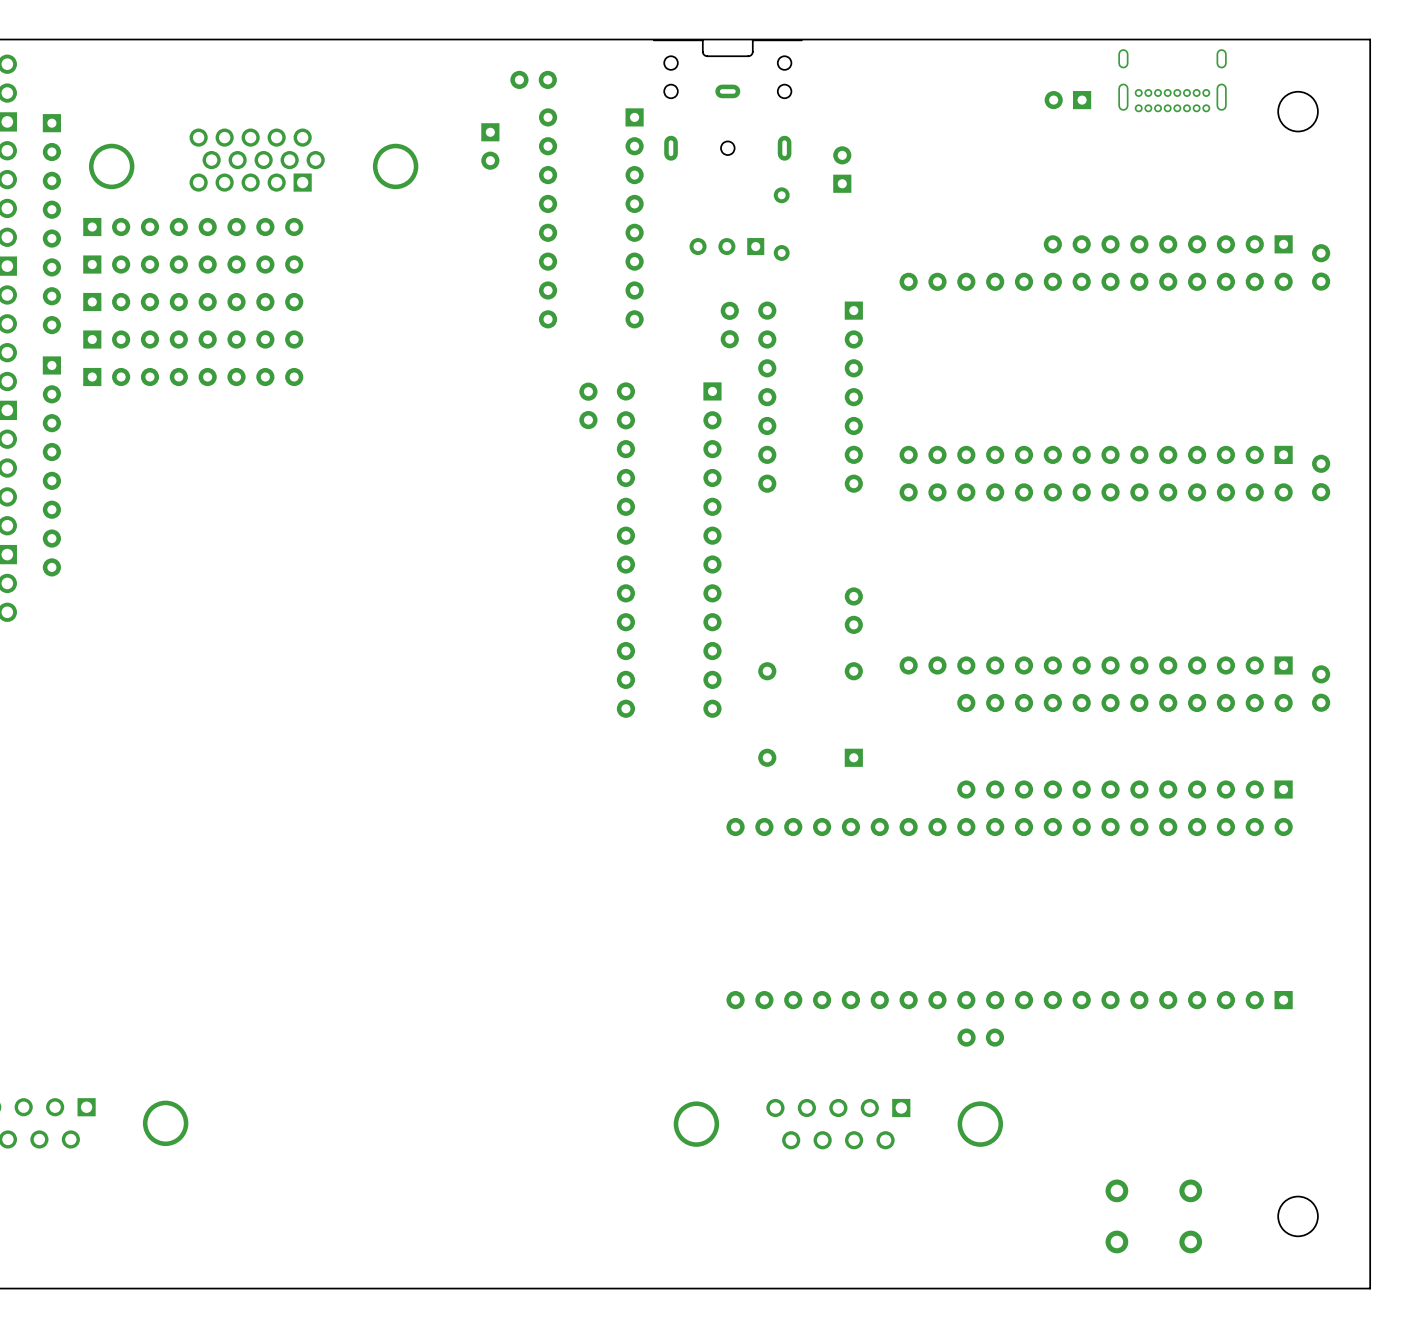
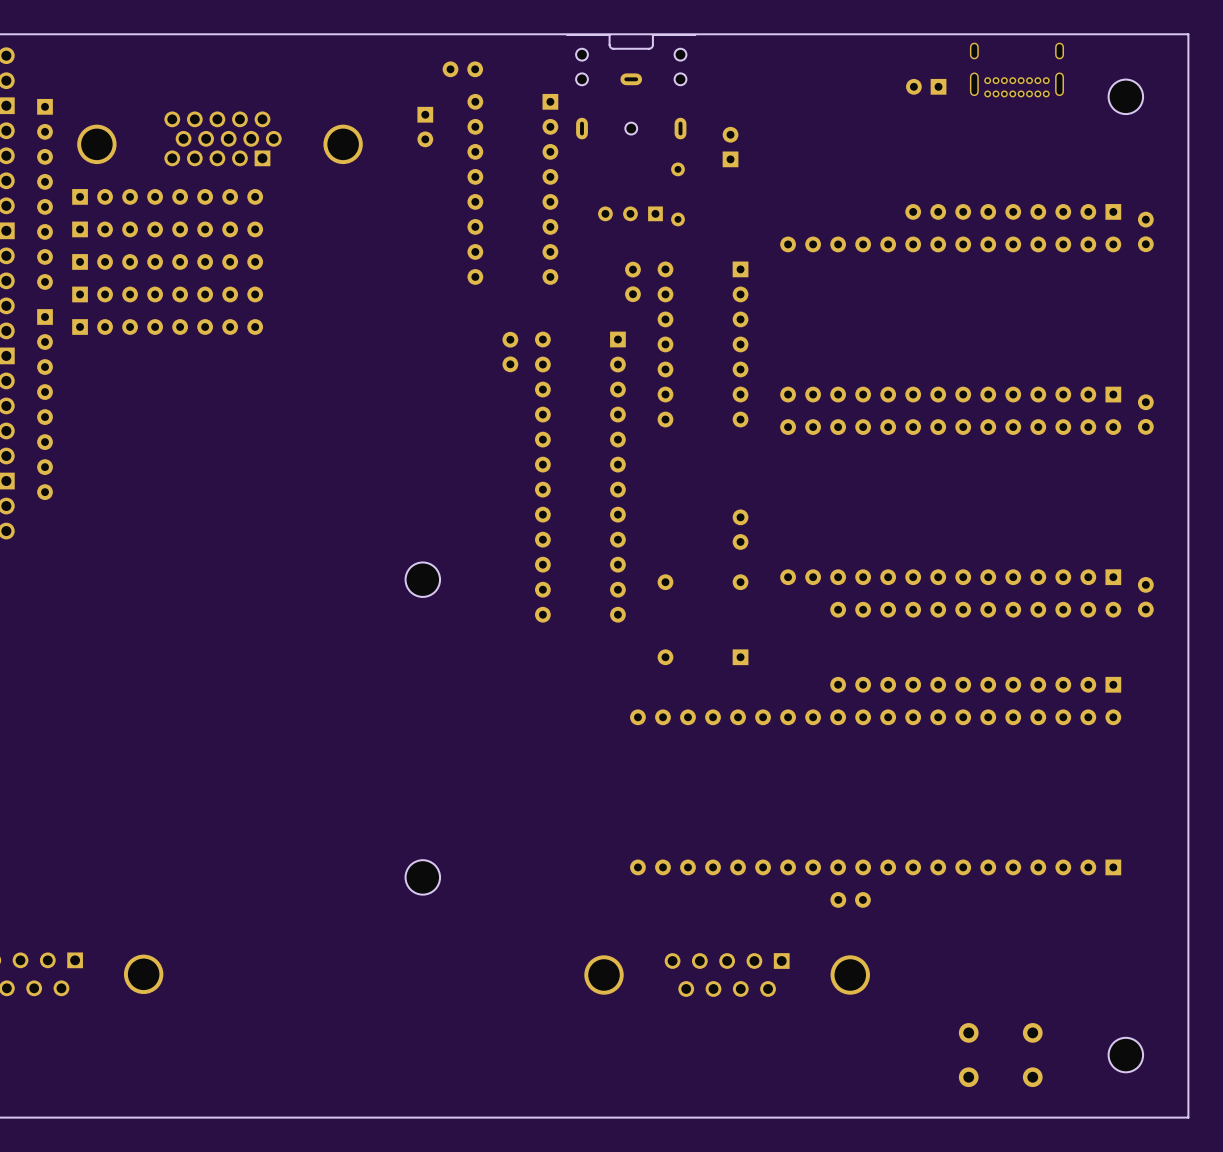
part: none -> (422, 579)
part: none -> (422, 877)

